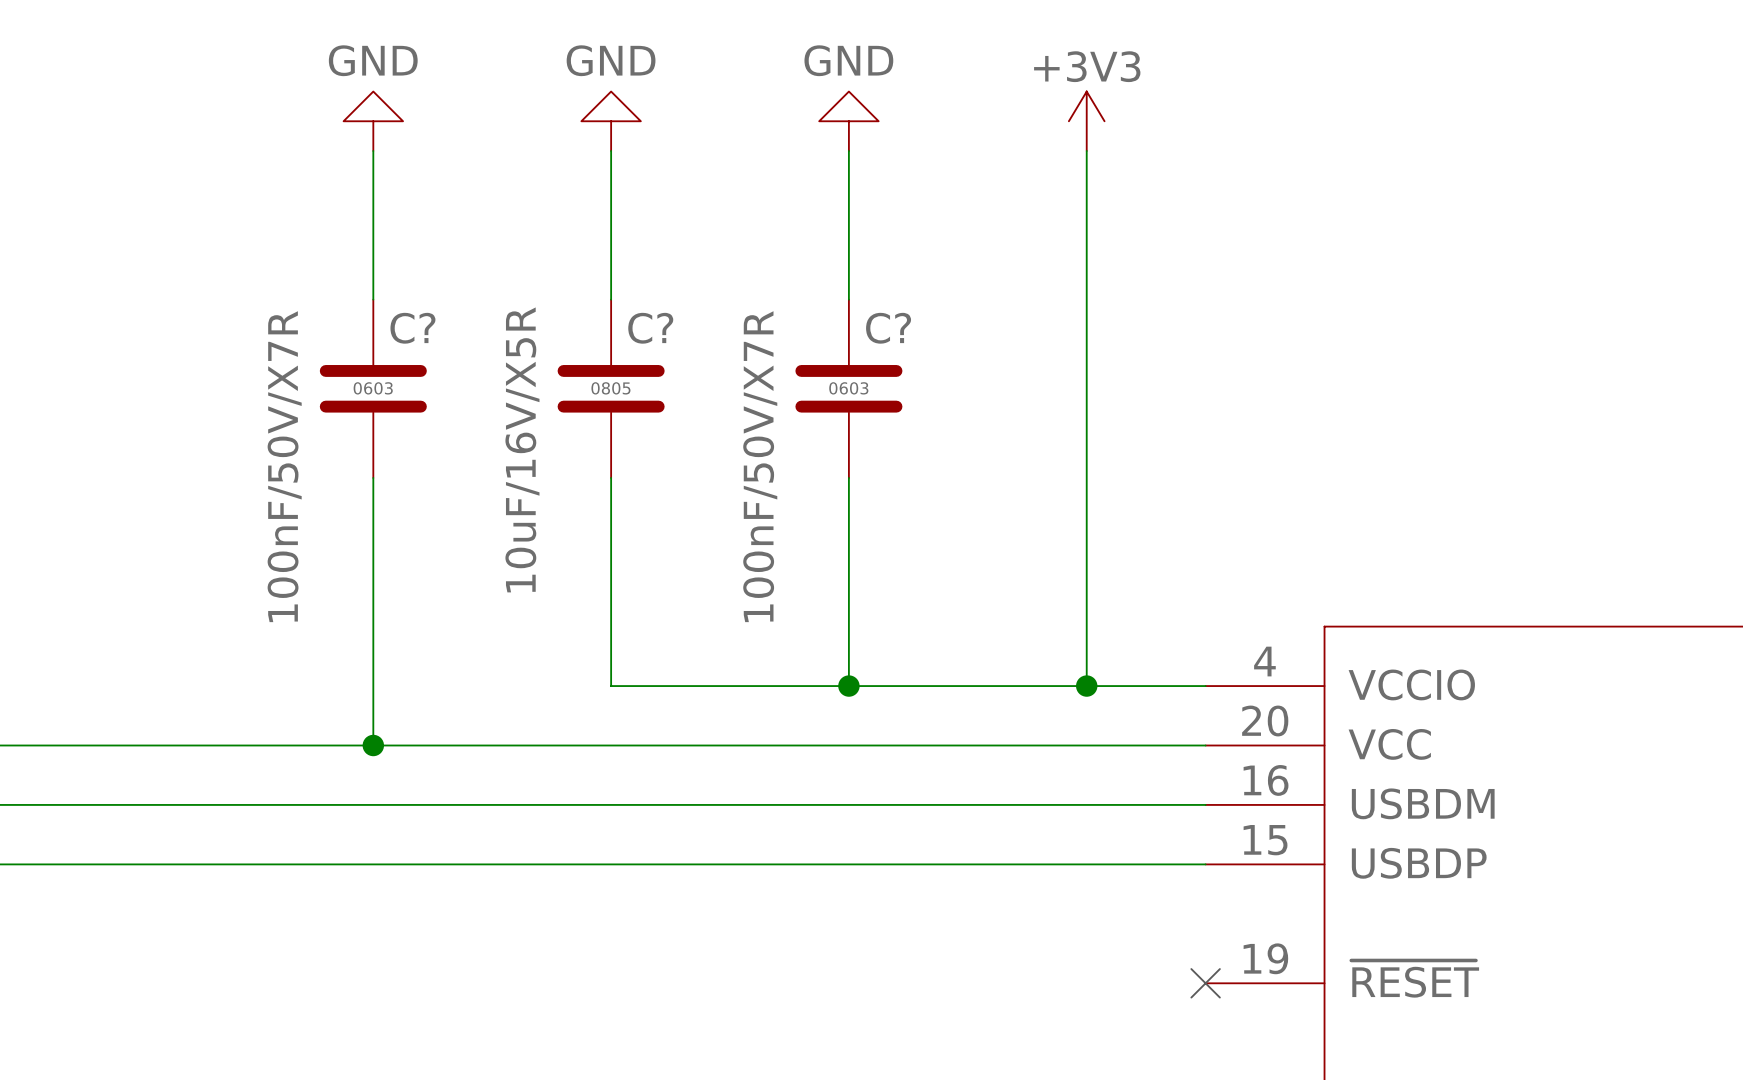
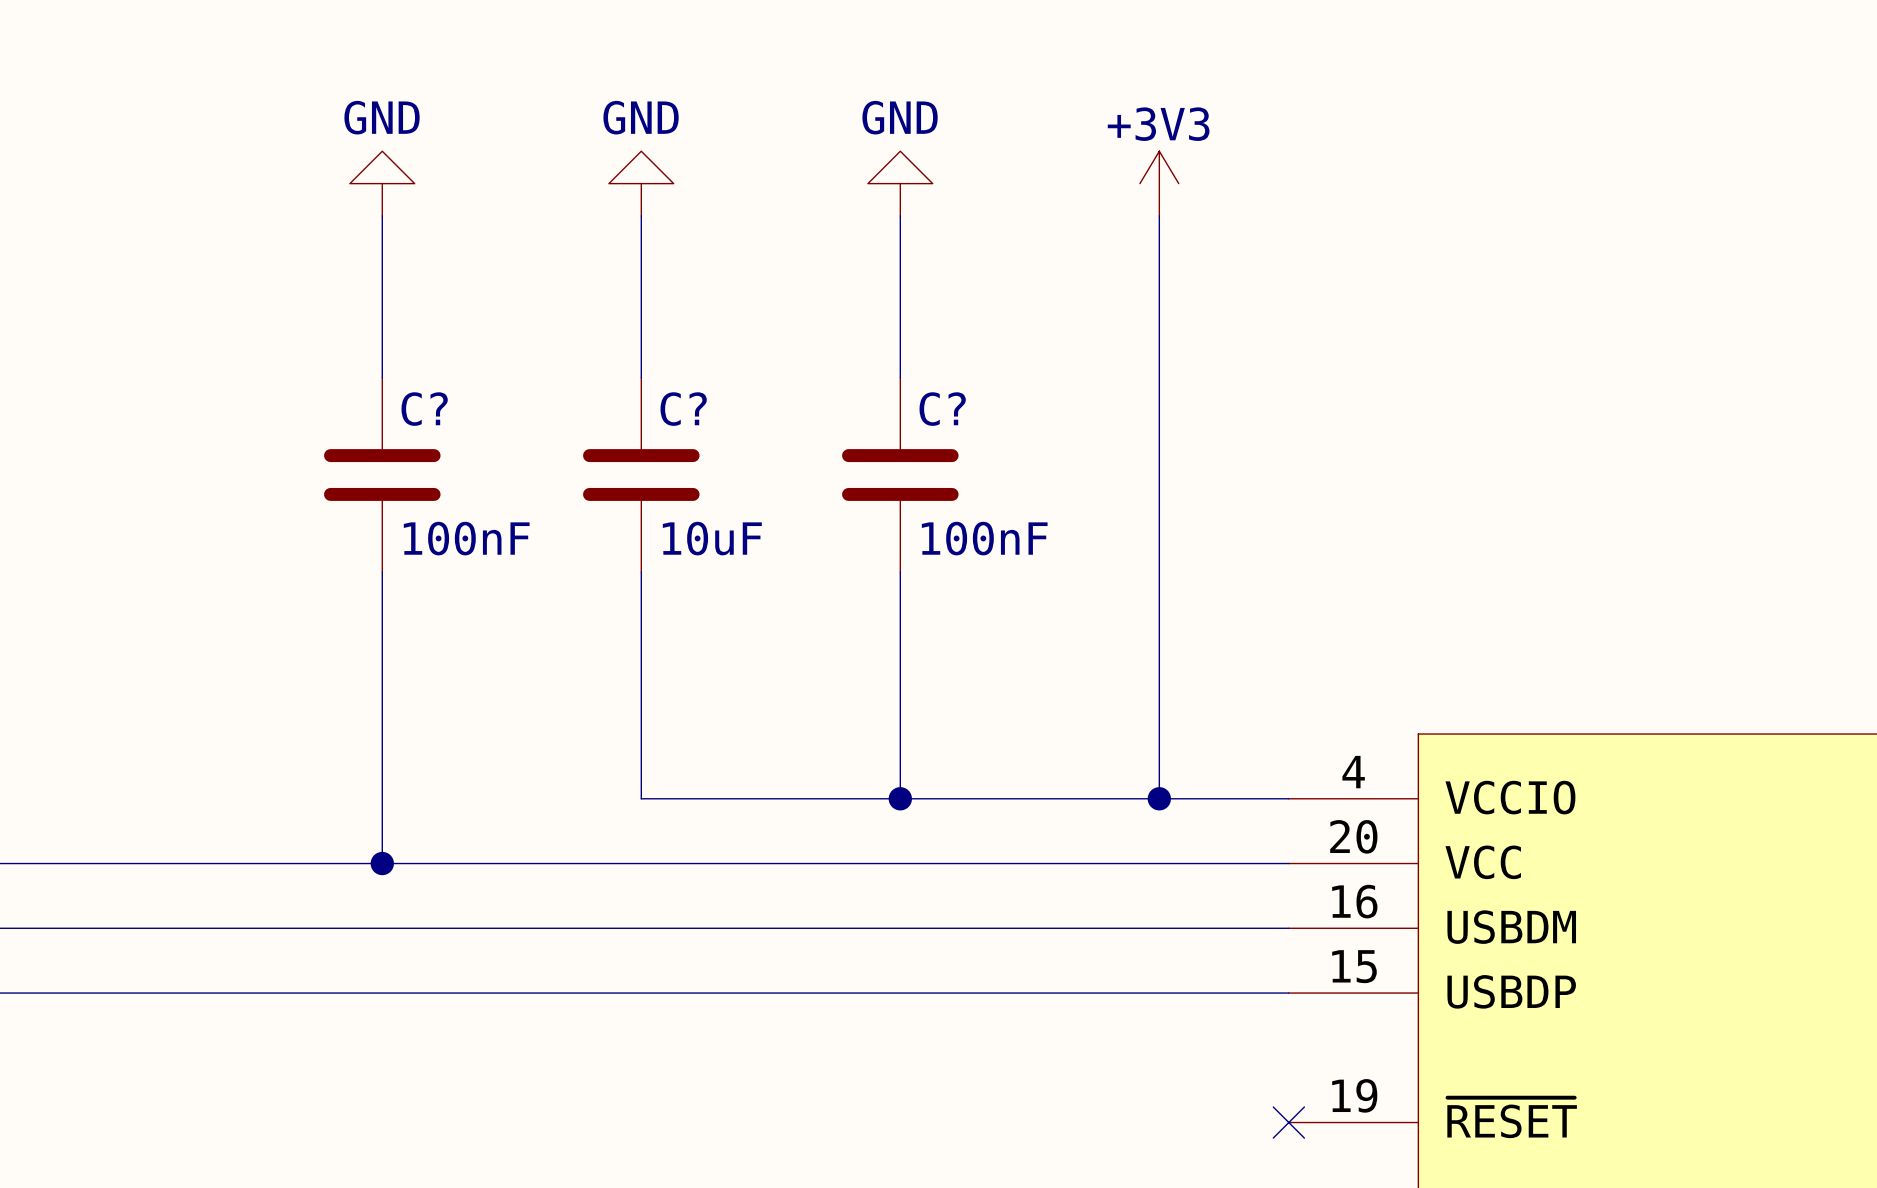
C? text: 0603 (373, 388) -> none
C? text: 0805 (610, 388) -> none
C? text: 0603 (848, 388) -> none
C? value: 10uF/16V/X5R (522, 449) -> 10uF (712, 538)
C? value: 100nF/50V/X7R (284, 466) -> 100nF (466, 538)
C? value: 100nF/50V/X7R (760, 466) -> 100nF (984, 538)

